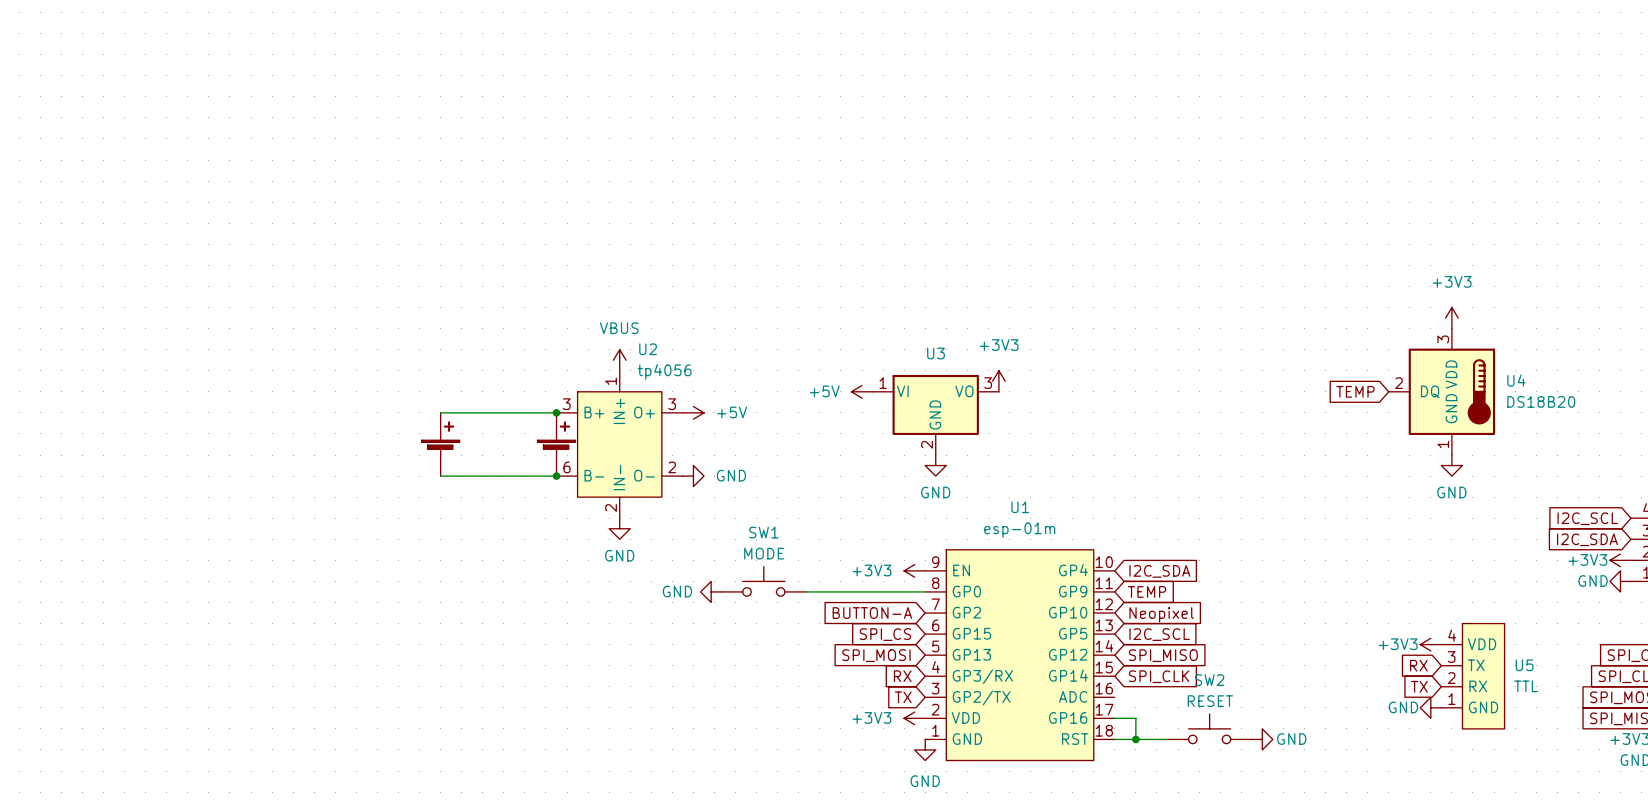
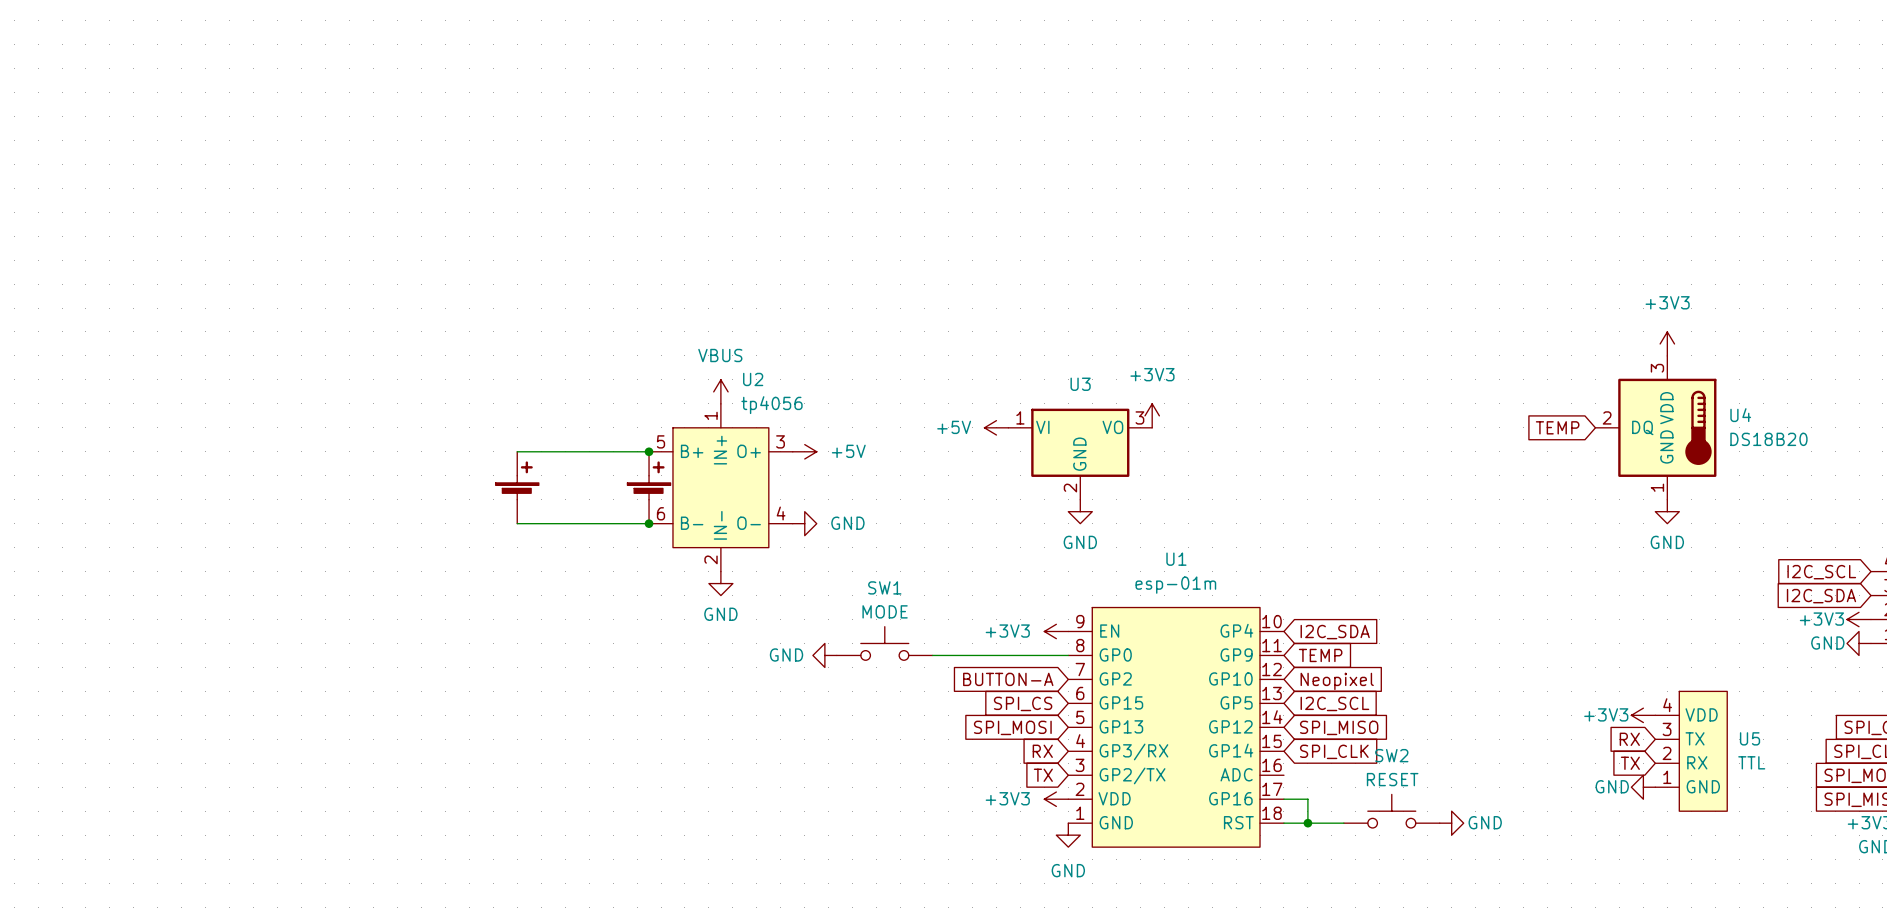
U2 pin number: 3 (566, 404) -> 5 (661, 441)
U2 pin number: 2 (672, 467) -> 4 (781, 513)

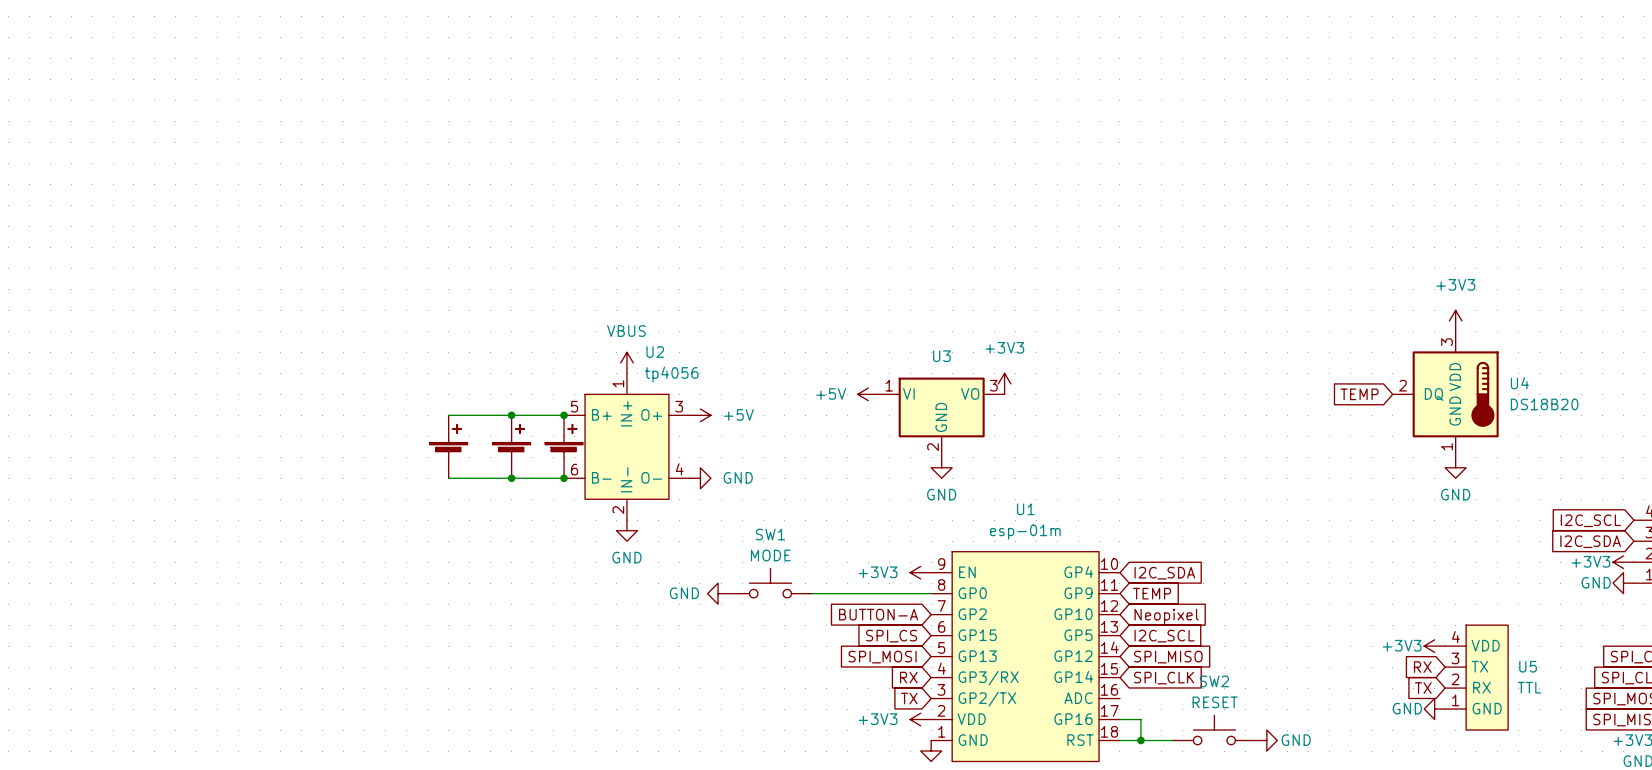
junction: none -> (511, 415)
part: none -> (511, 446)
junction: none -> (511, 478)

